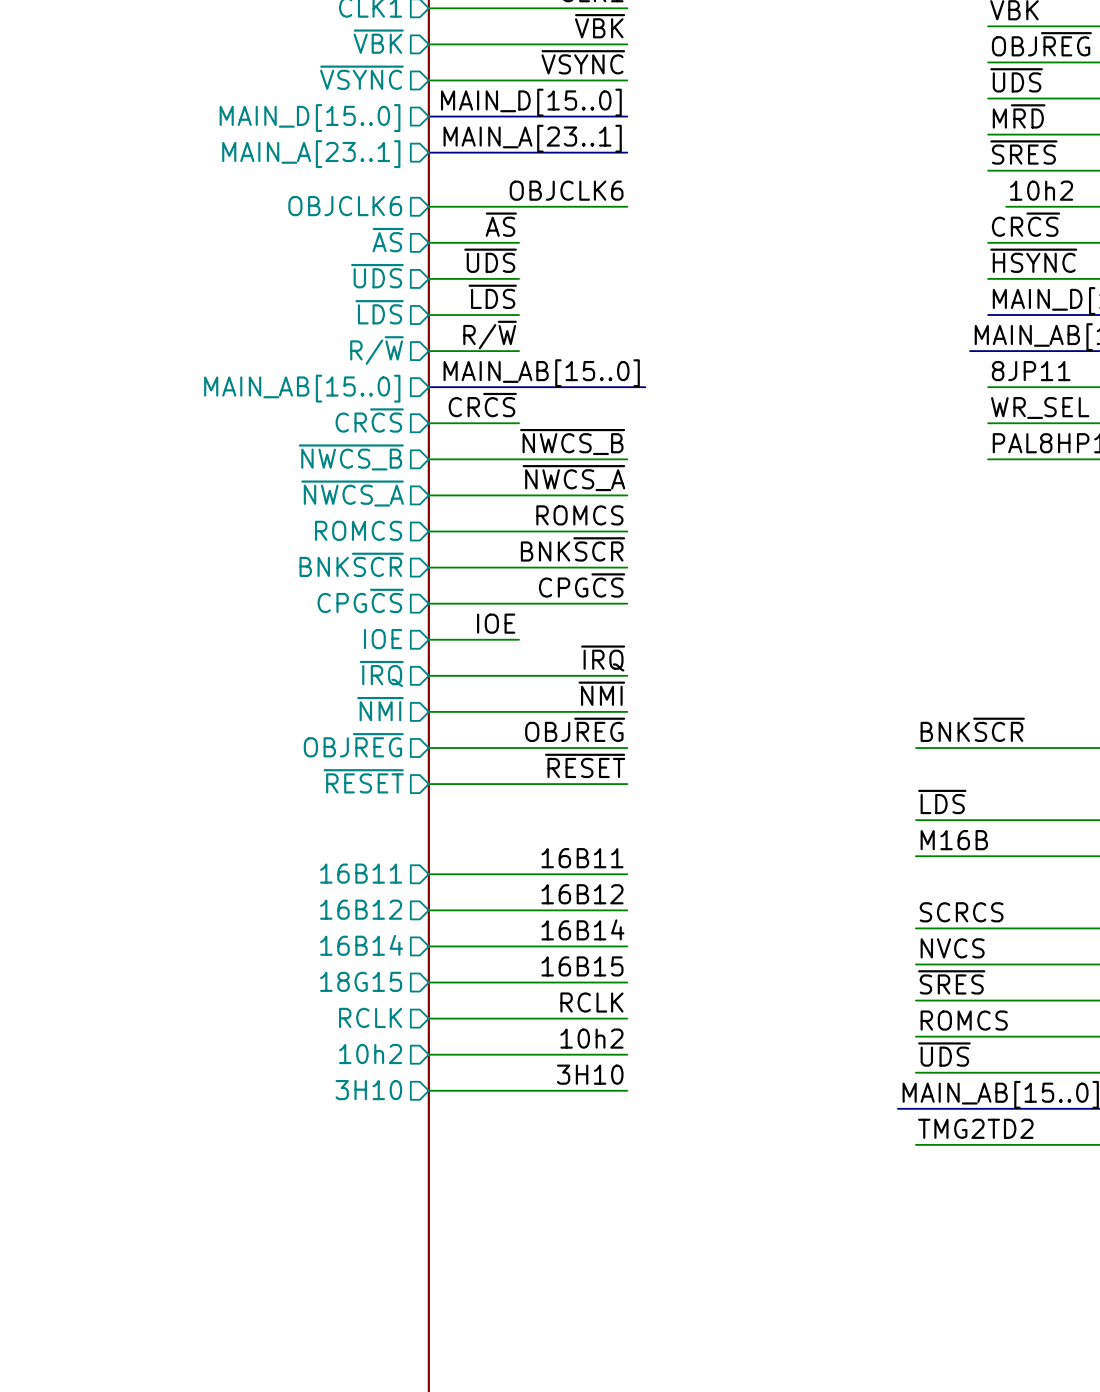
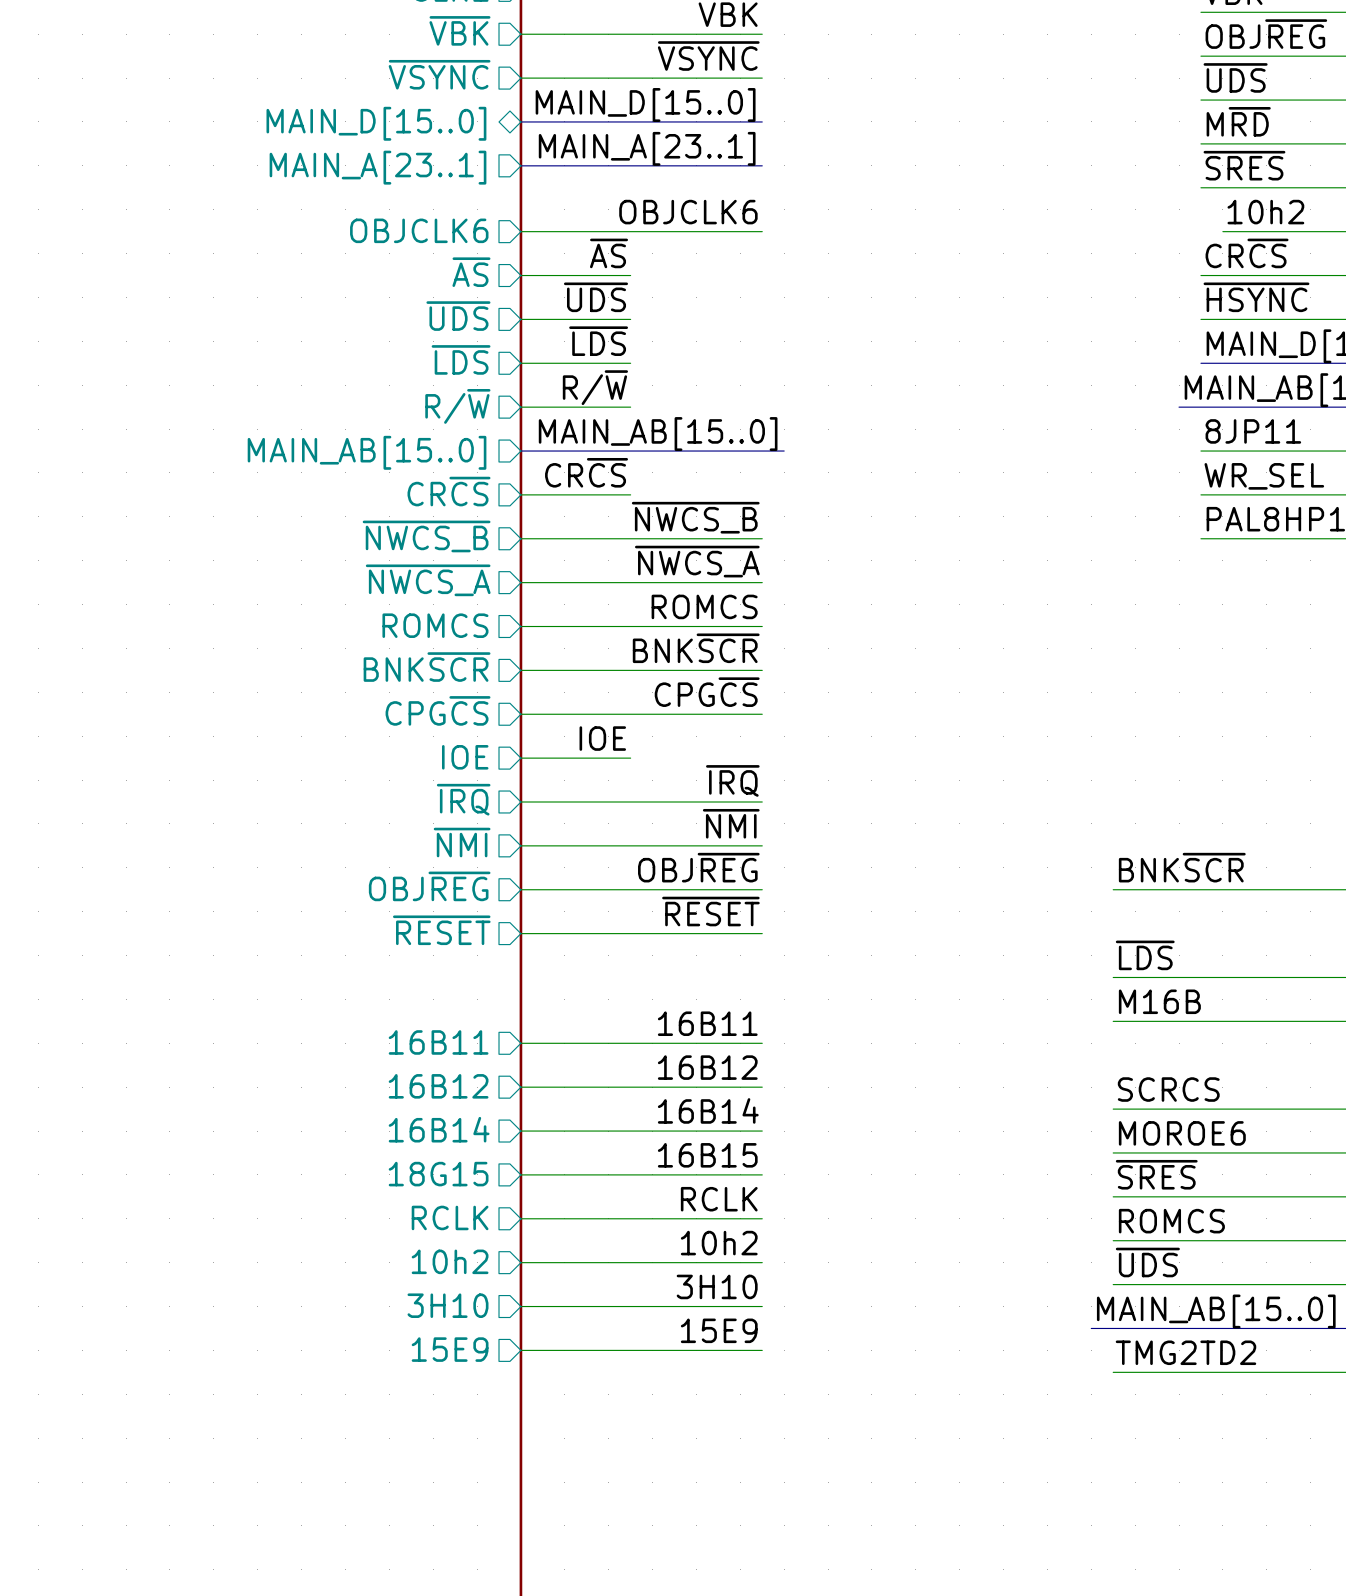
sheet pin shape: output (310, 118) -> bidirectional (376, 123)
label: NVCS (952, 948) -> MOROE6 (1182, 1133)
label: none -> 15E9 (719, 1330)
sheet pin: none -> 15E9 (450, 1349)
wire: none -> (520, 1350) (762, 1350)

